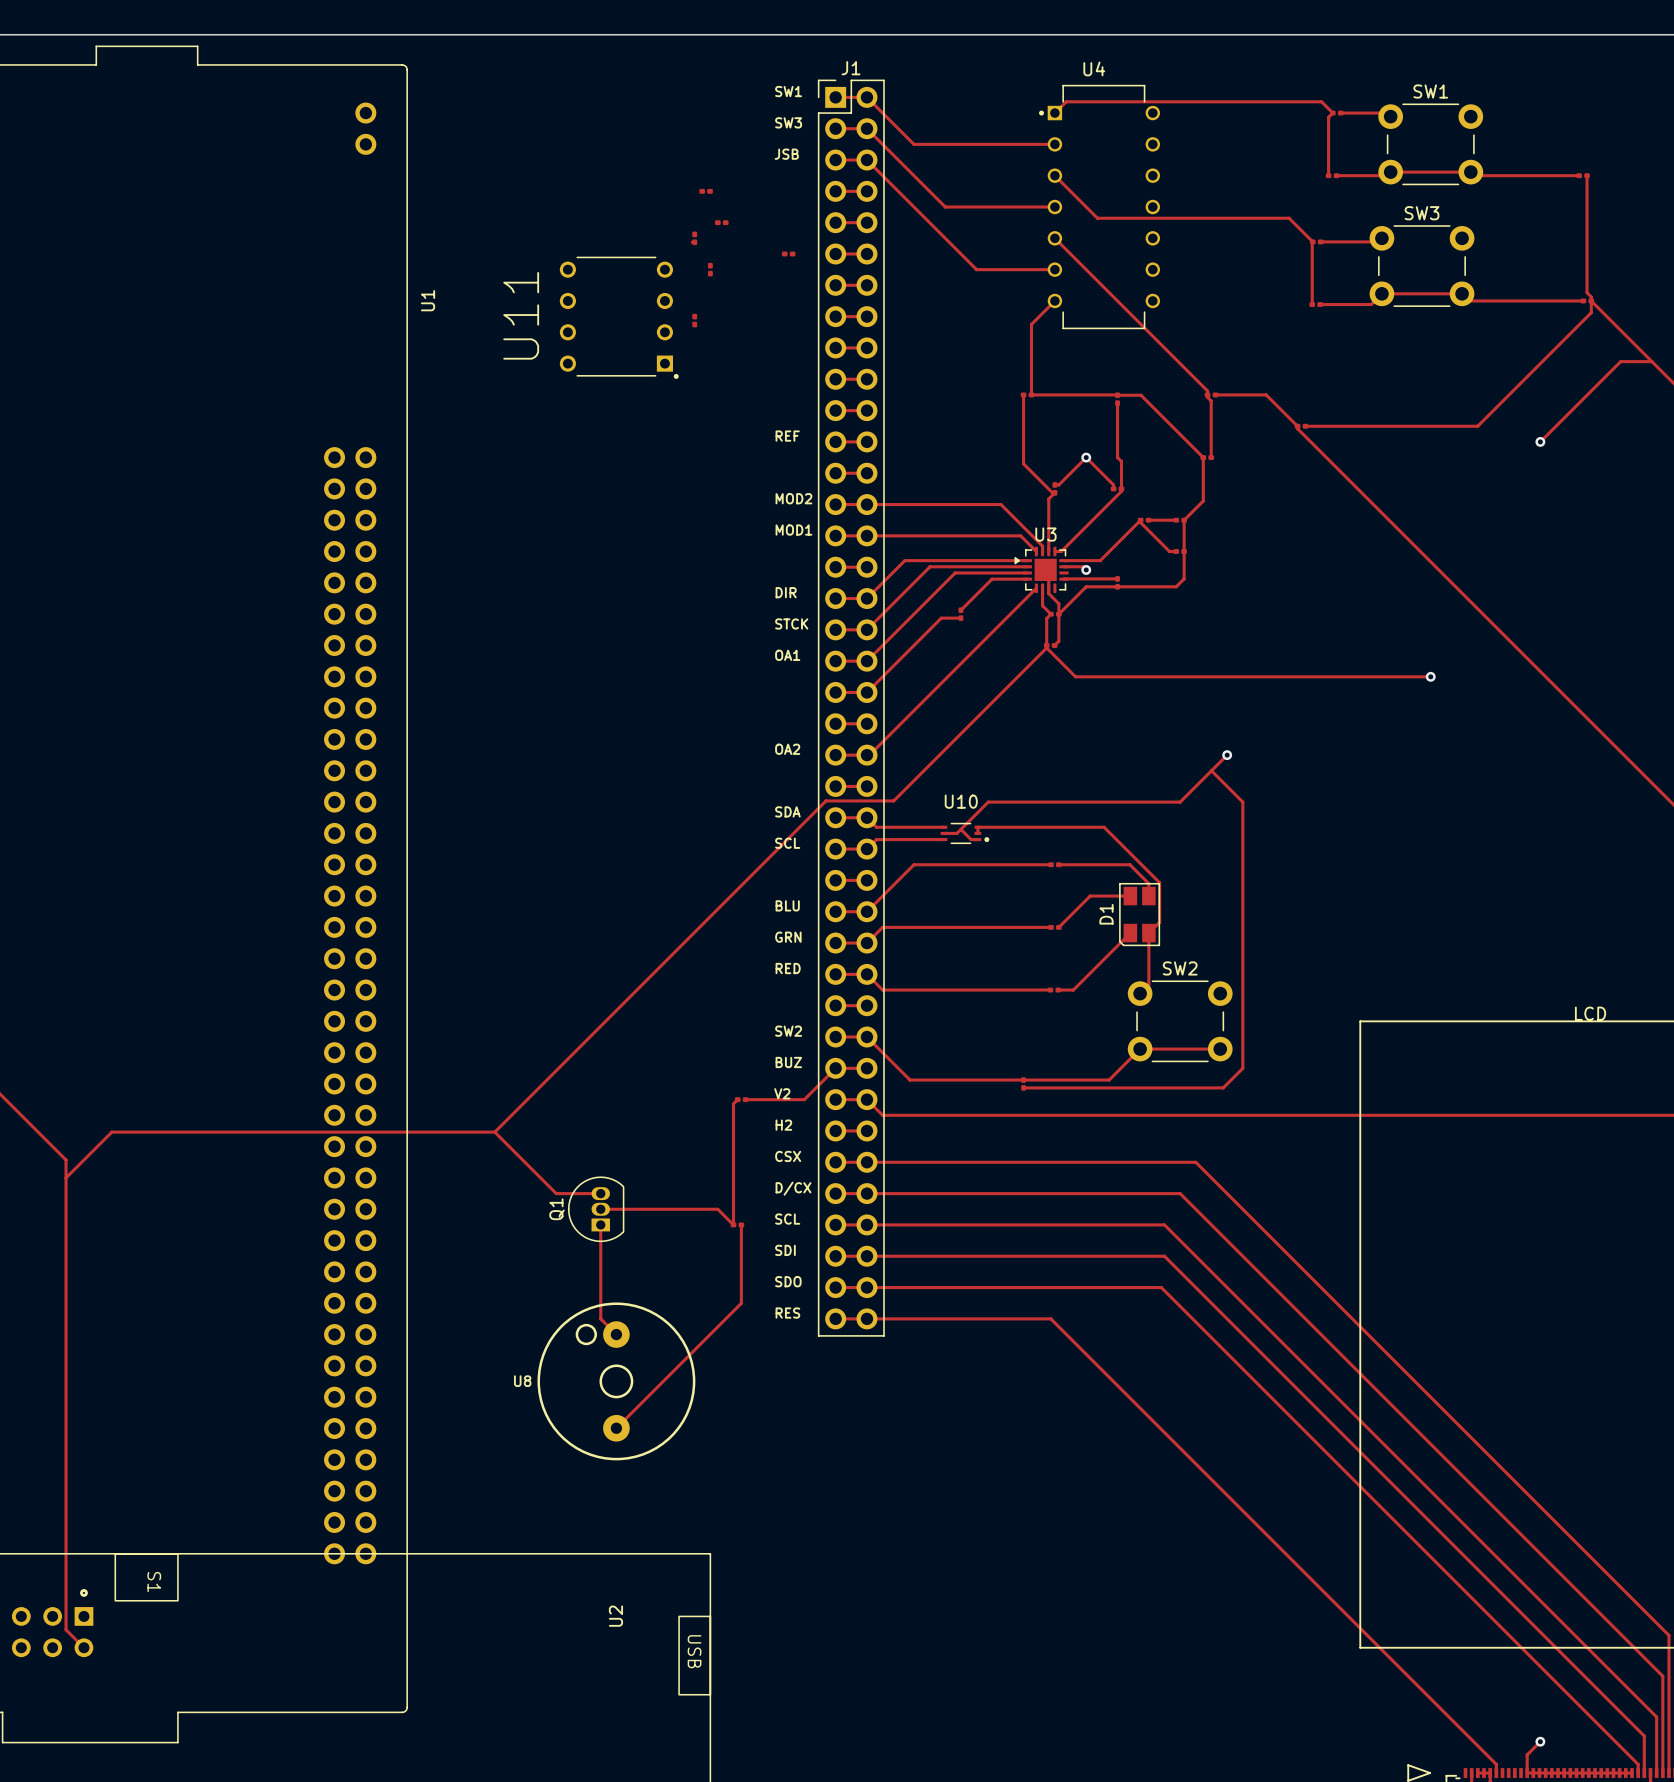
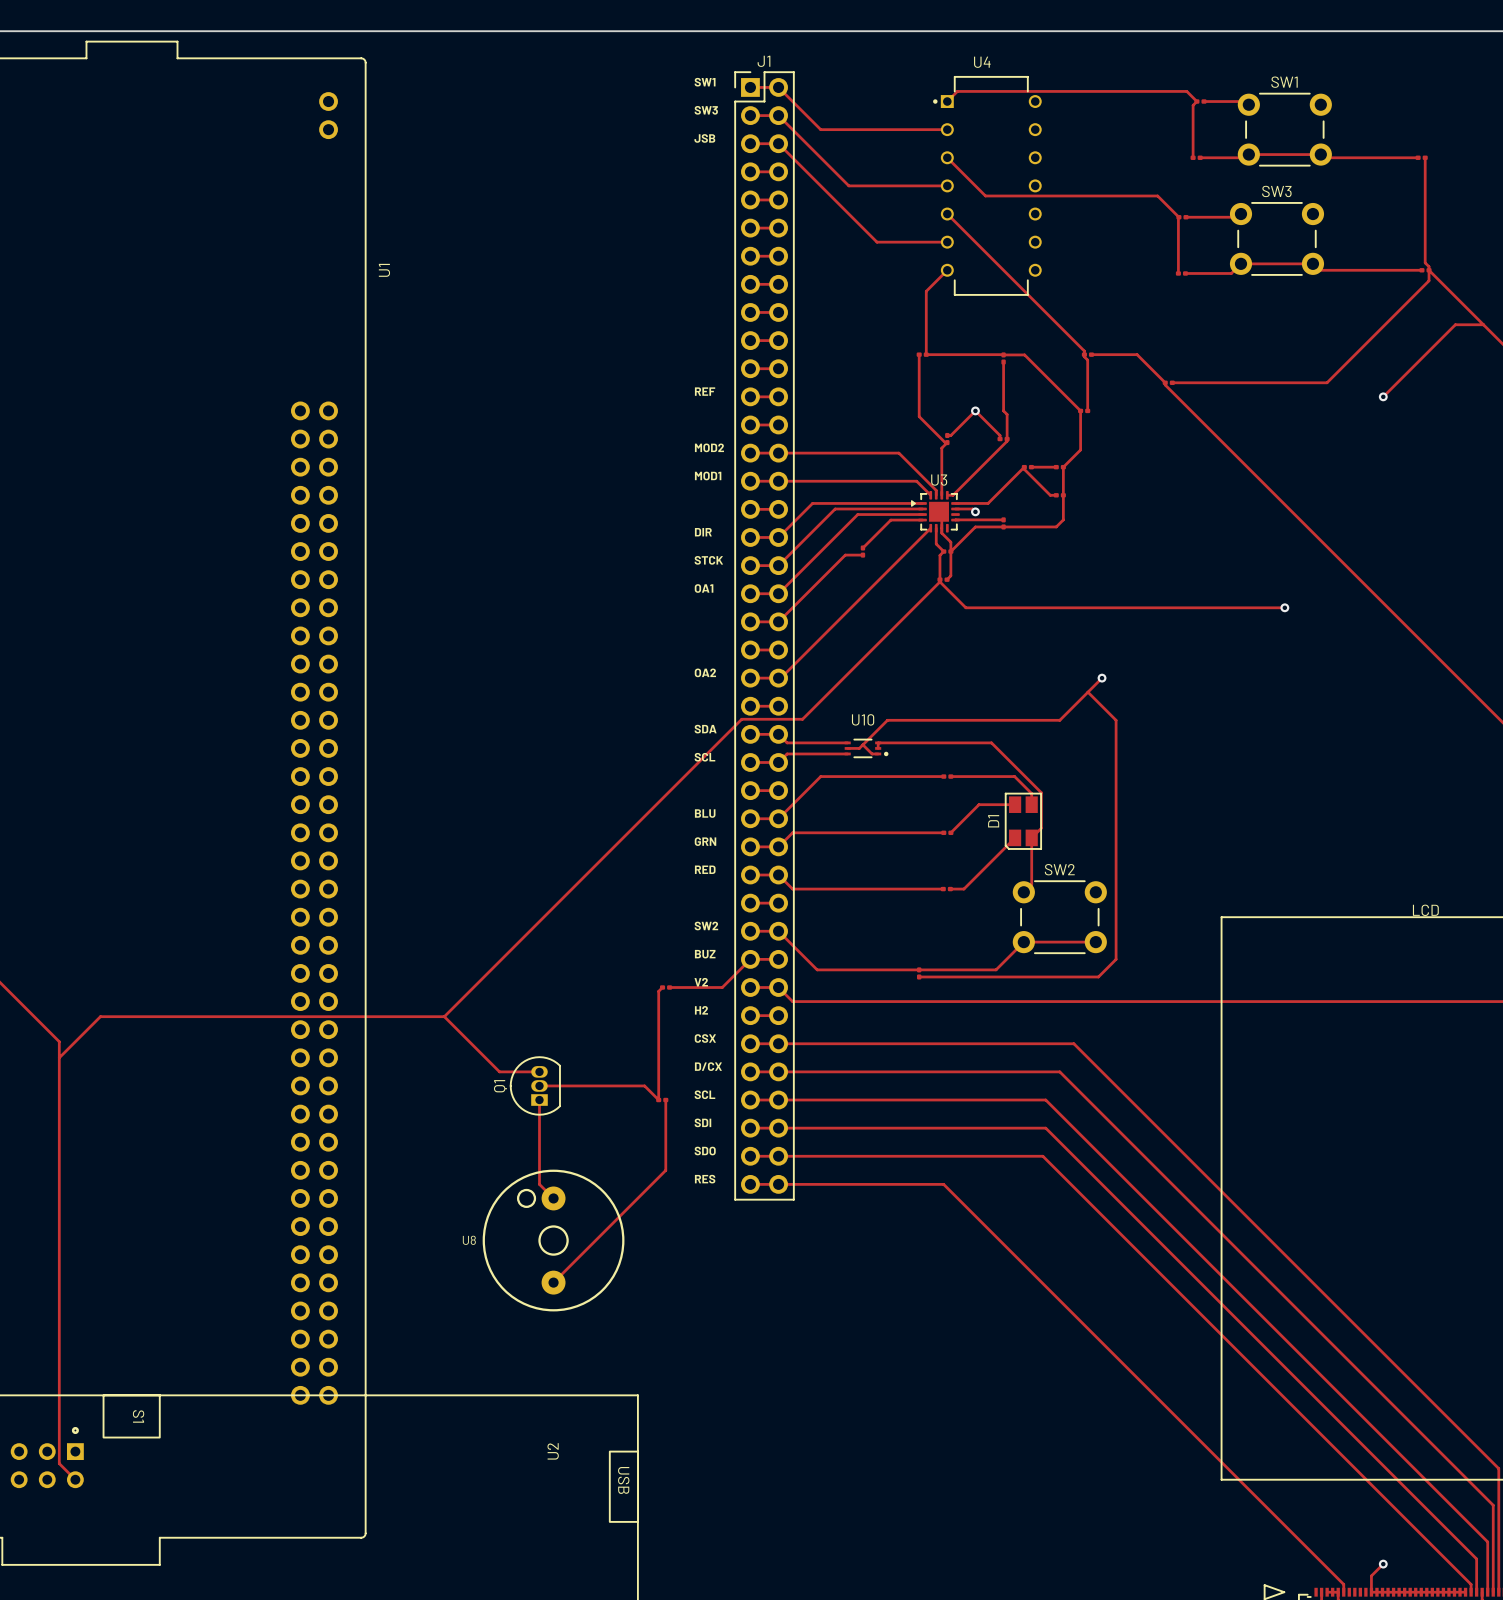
part: (706, 191) -> none
part: (721, 222) -> none
part: (694, 238) -> none
track: (692, 242) (694, 242) -> none
part: (788, 253) -> none
part: (710, 269) -> none
U11: (619, 317) -> none
part: (694, 320) -> none

